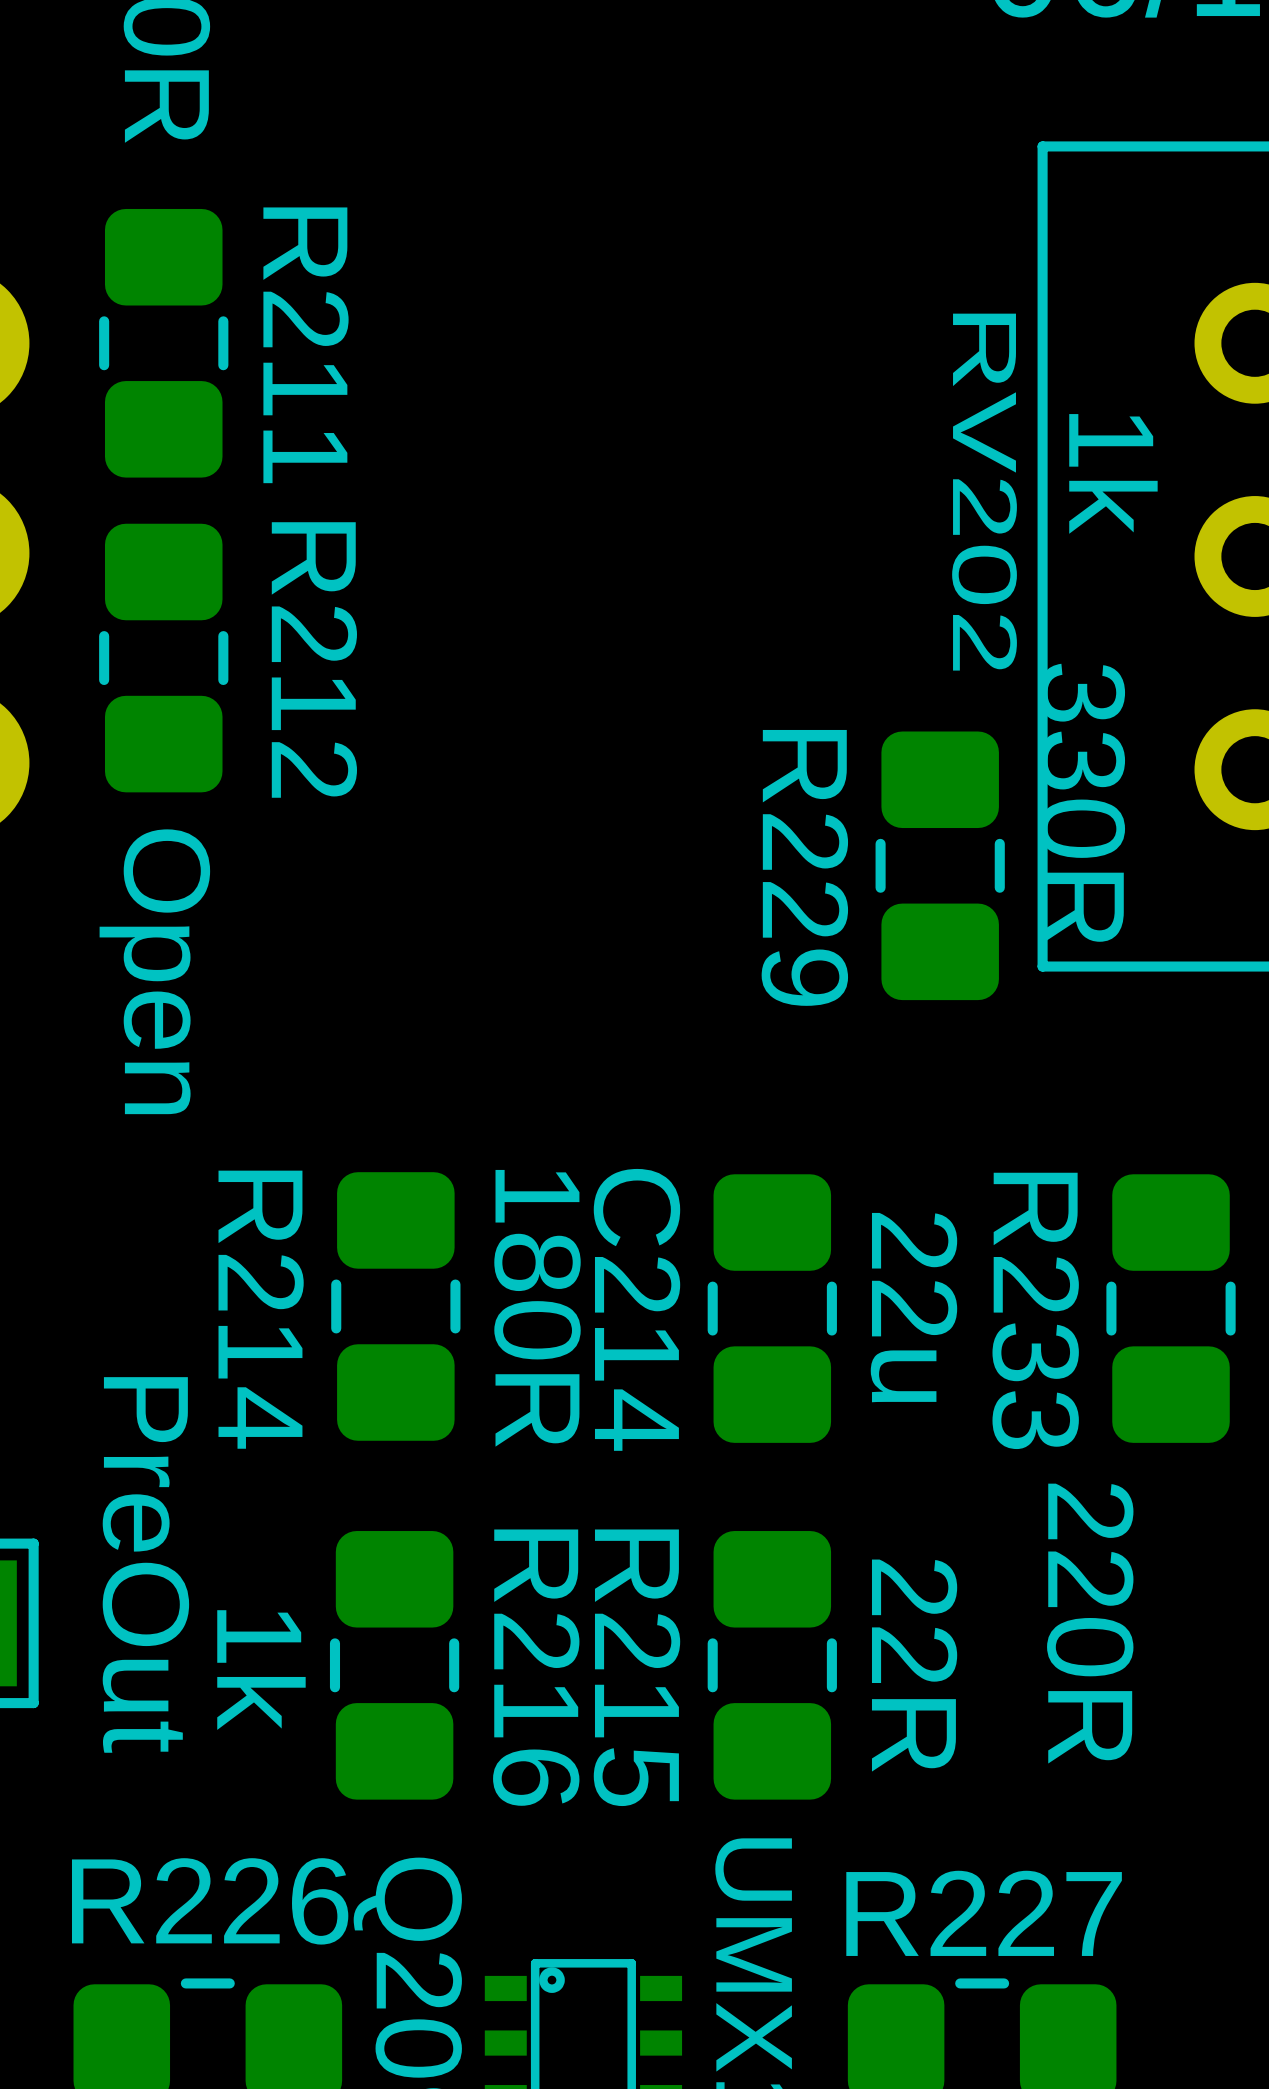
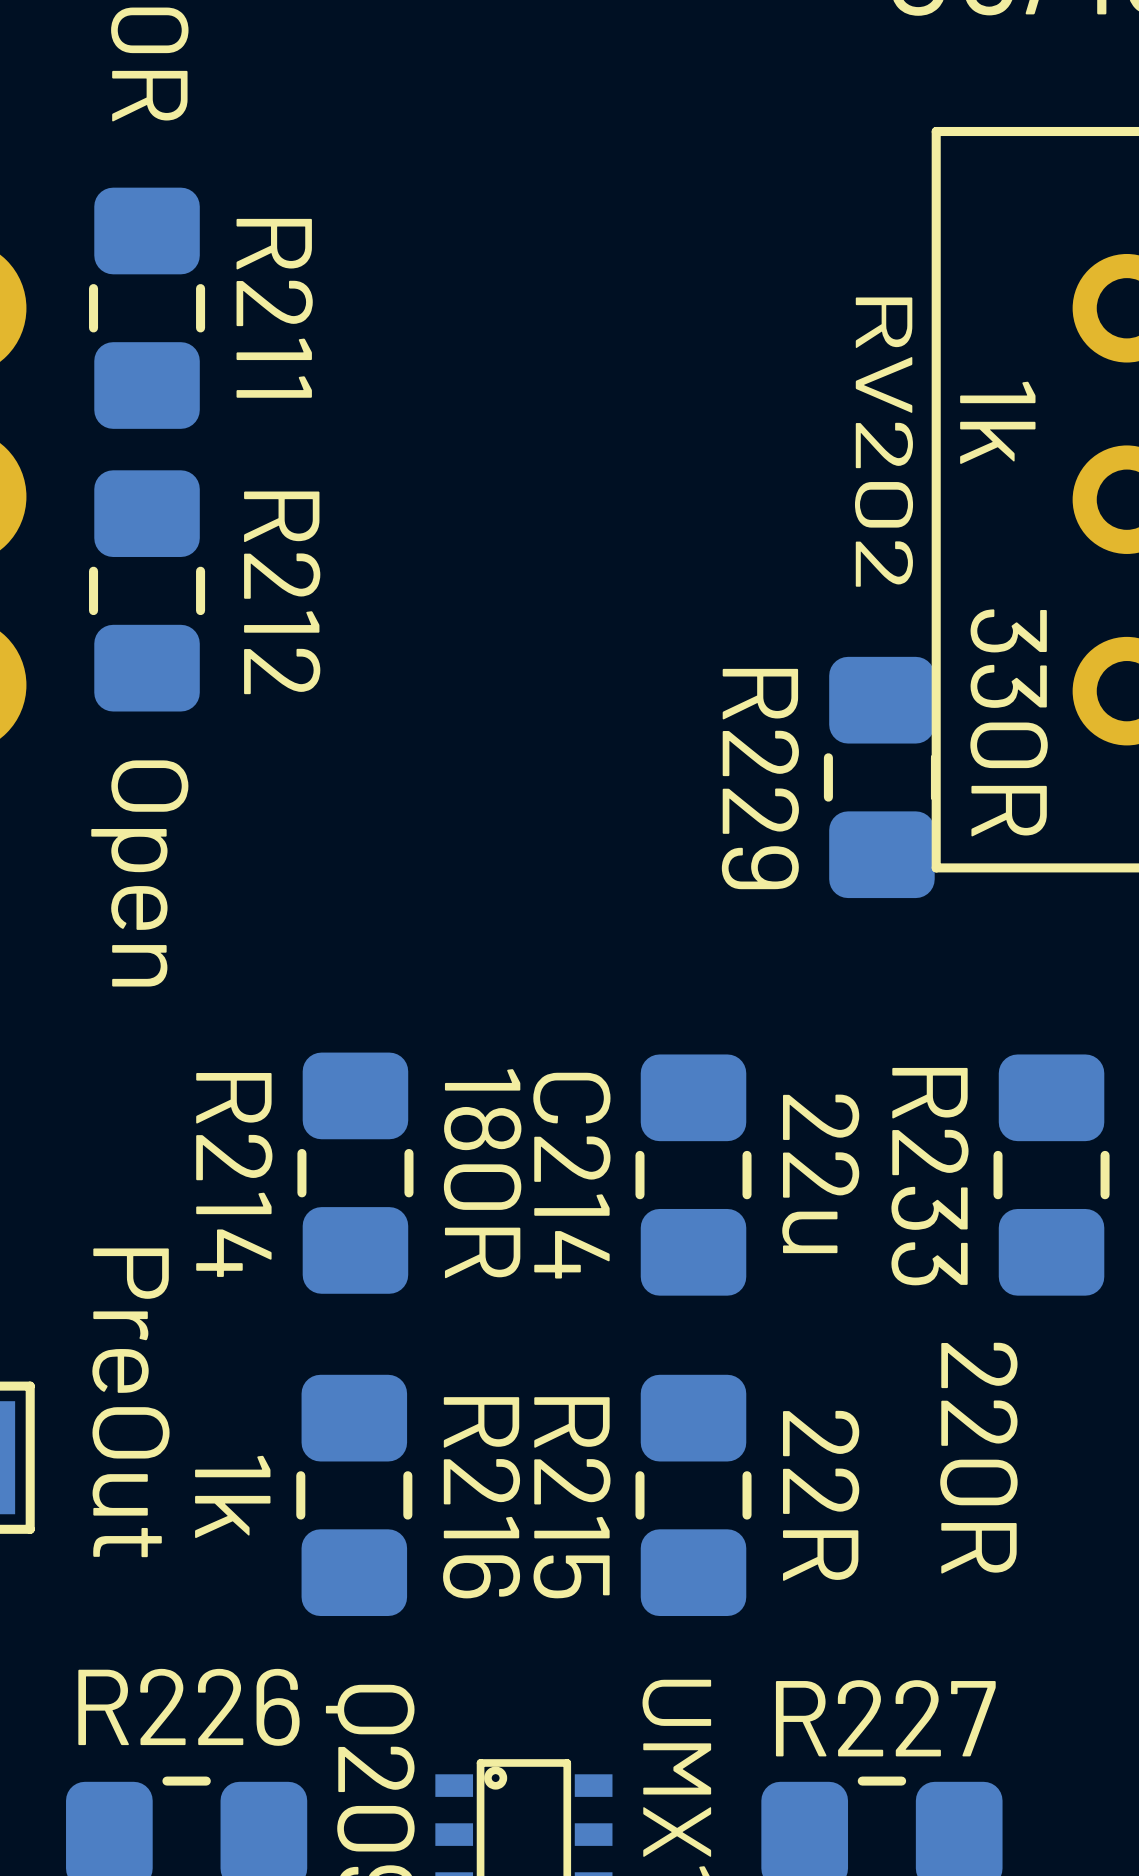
R229 position: (940, 865) -> (881, 777)

